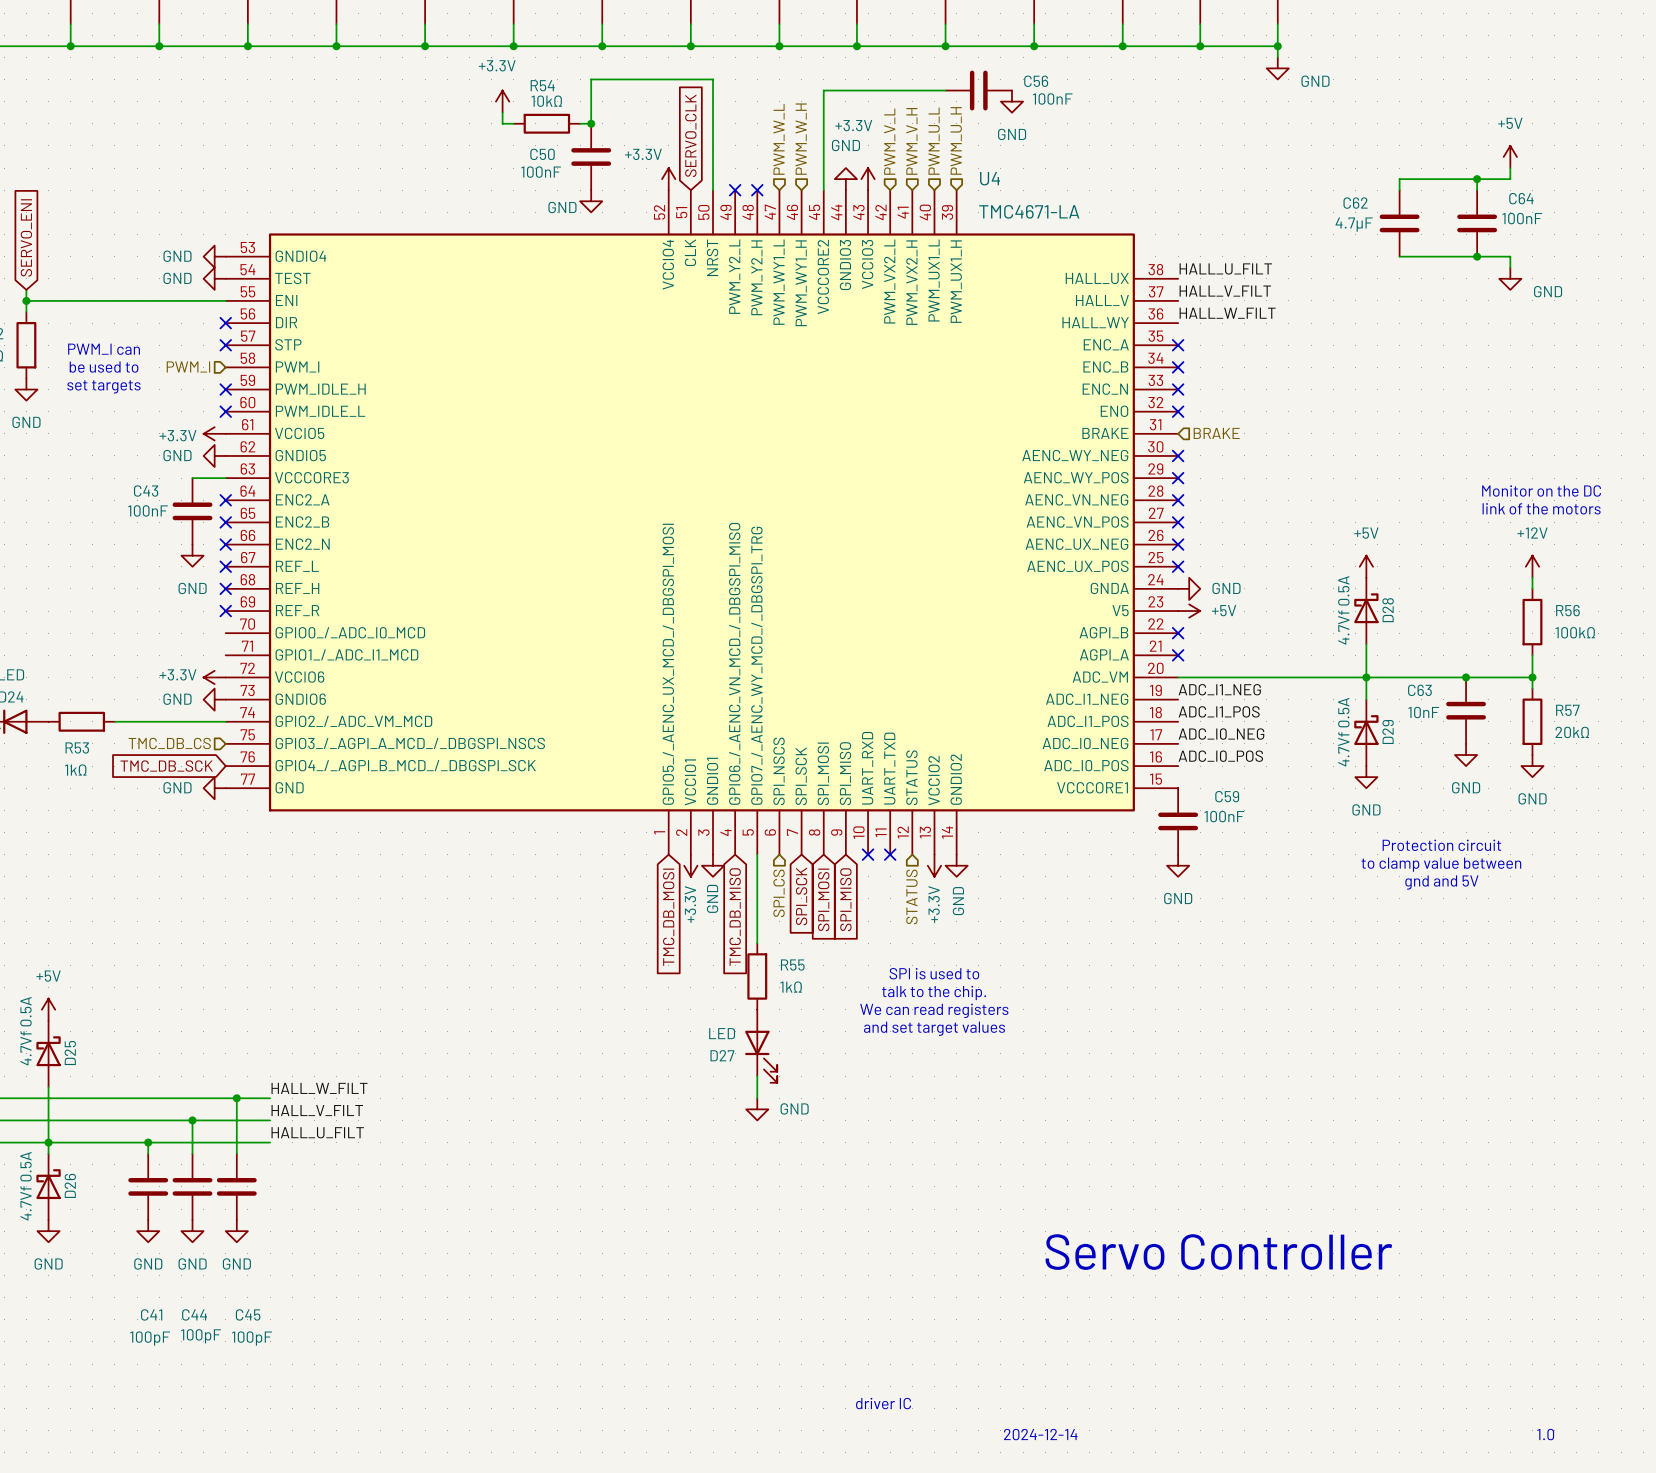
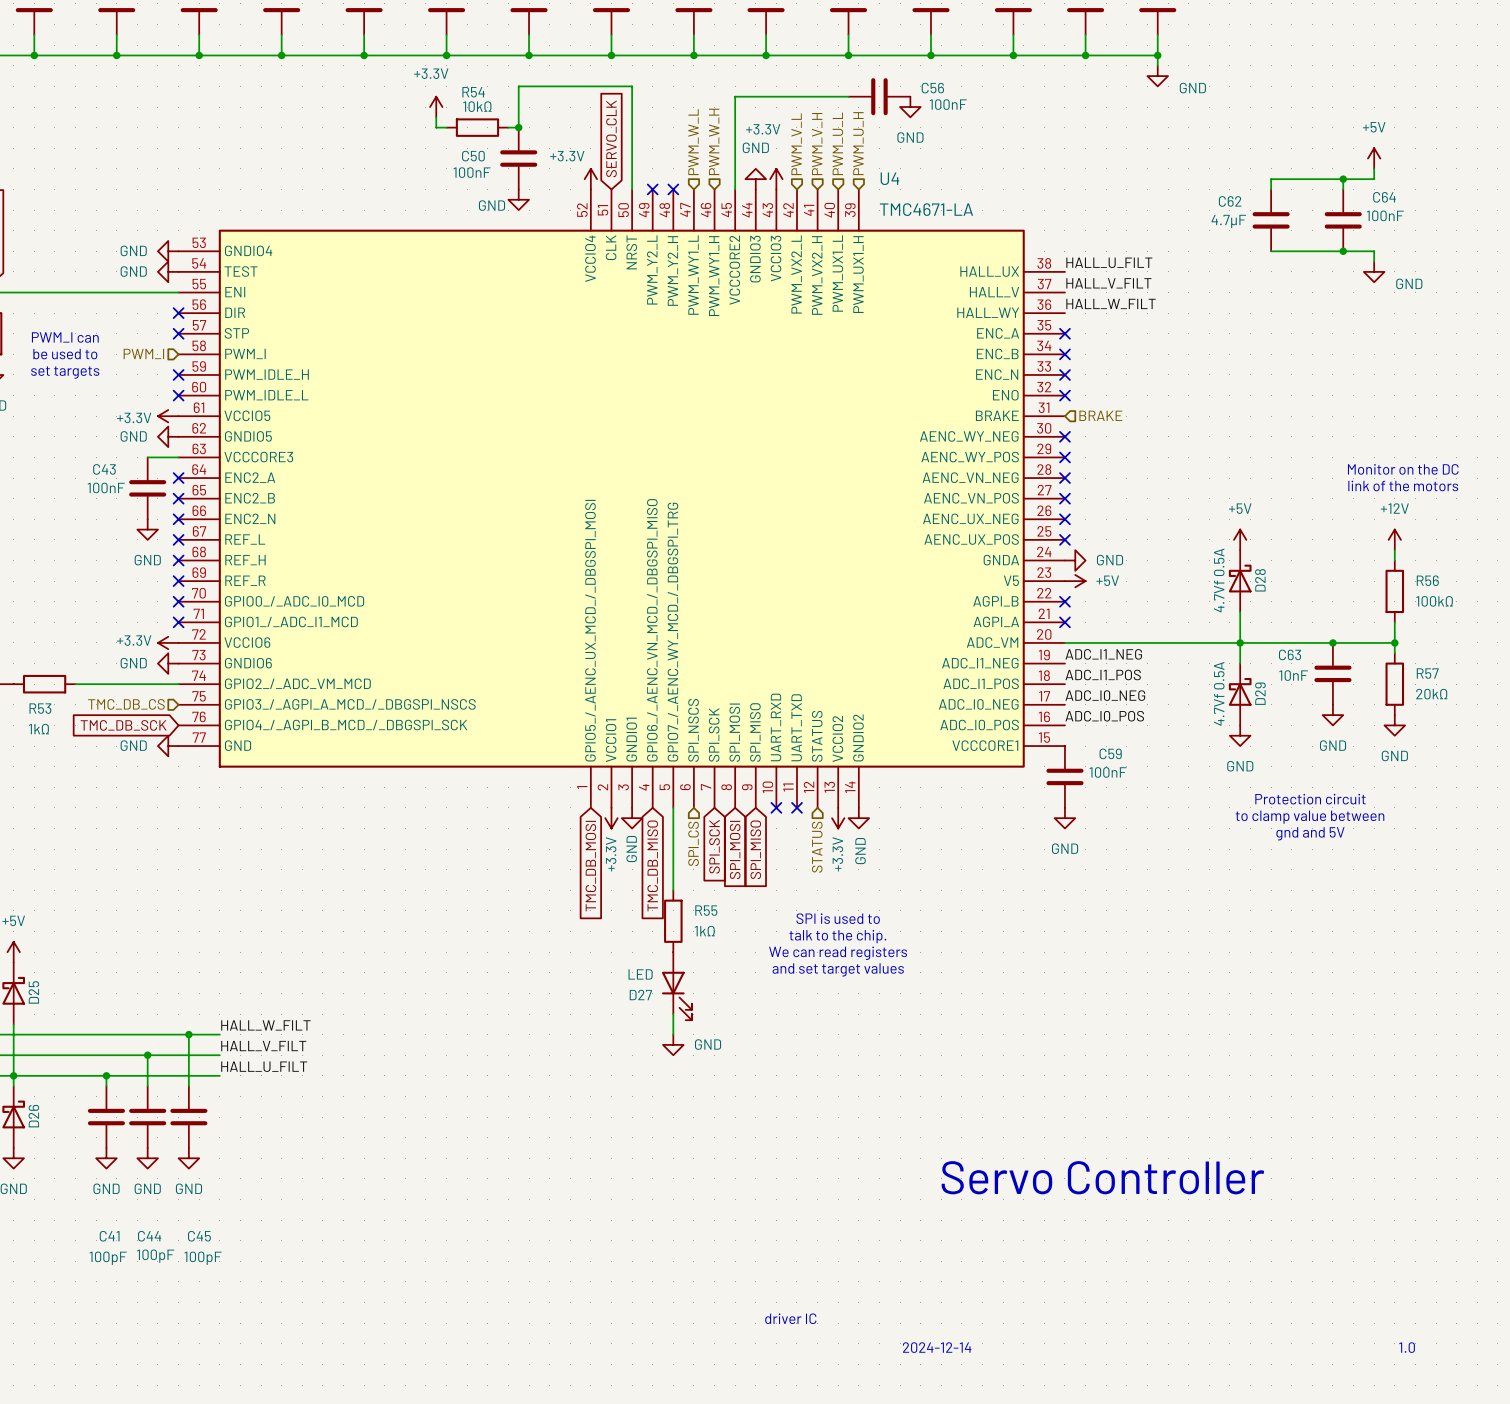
no-connect mark: none -> (178, 601)
no-connect mark: none -> (178, 622)

